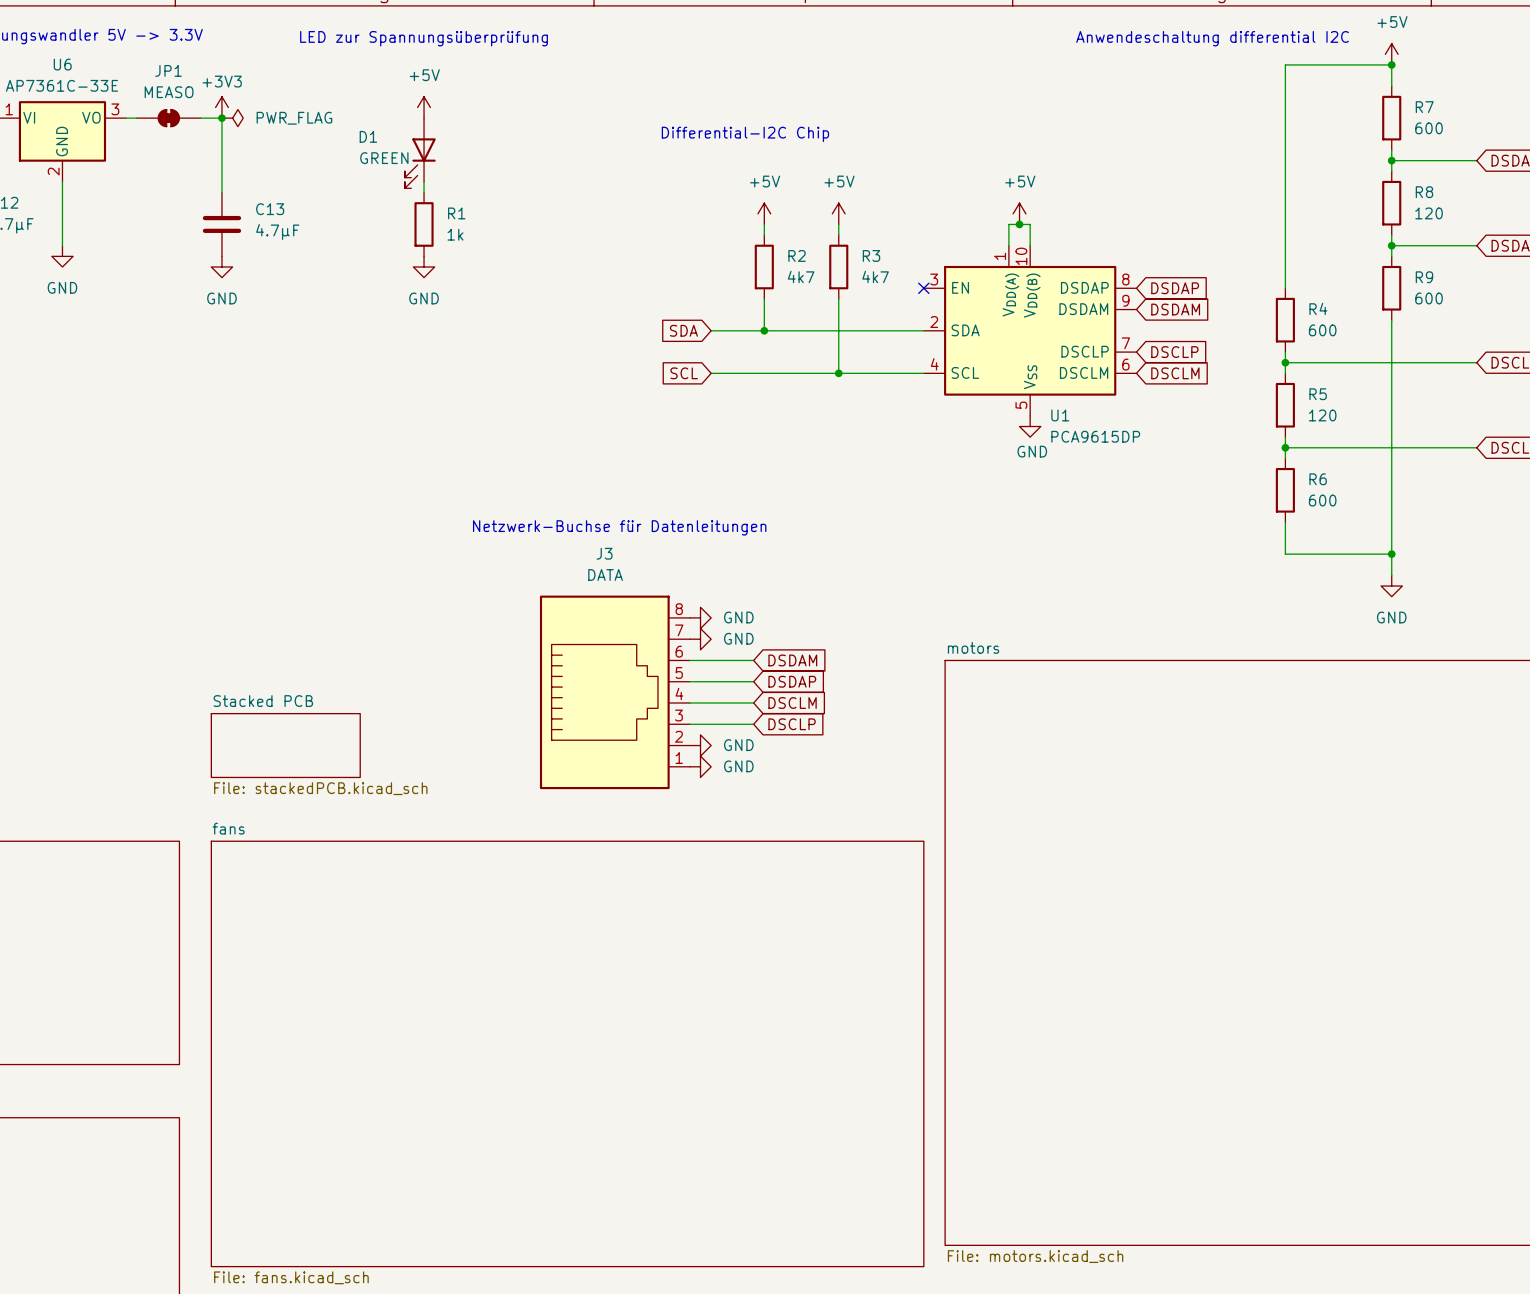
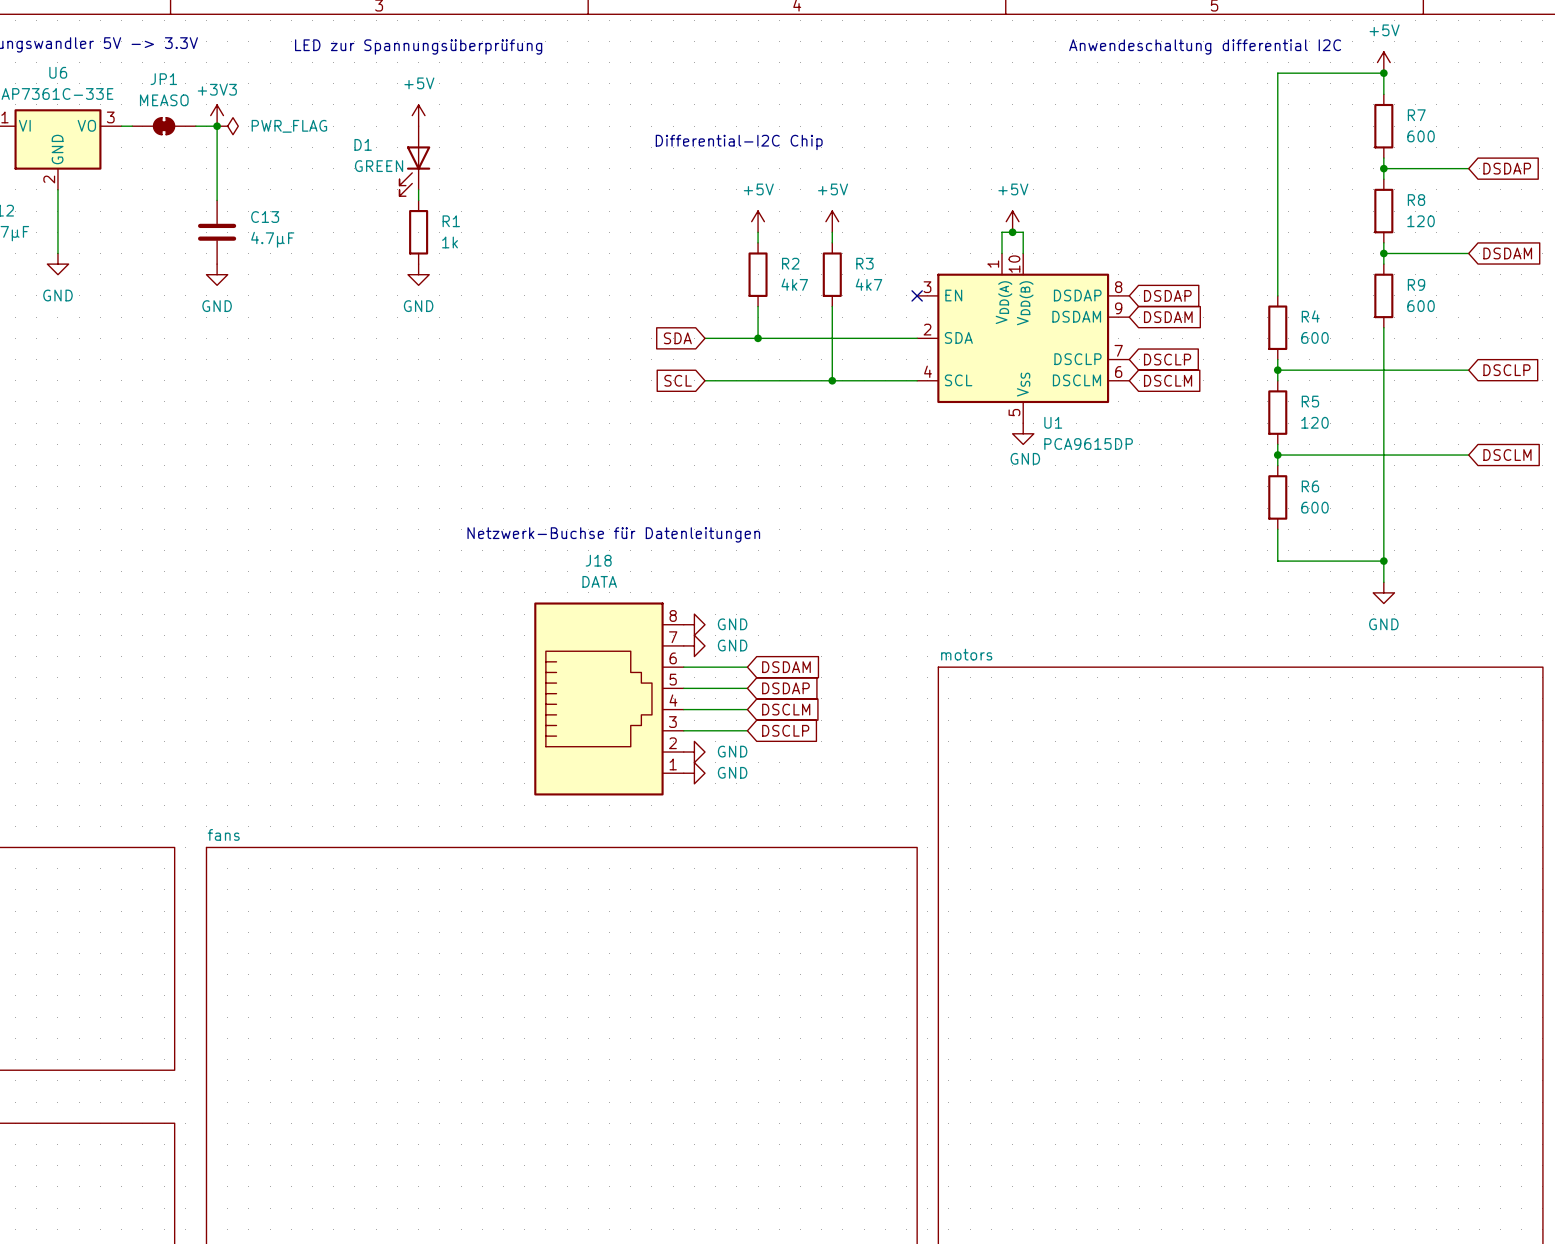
J3 name: J3 (604, 553) -> J18 (598, 560)
sheet Stacked PCB: File: stackedPCB.kicad_sch (285, 745) -> none

